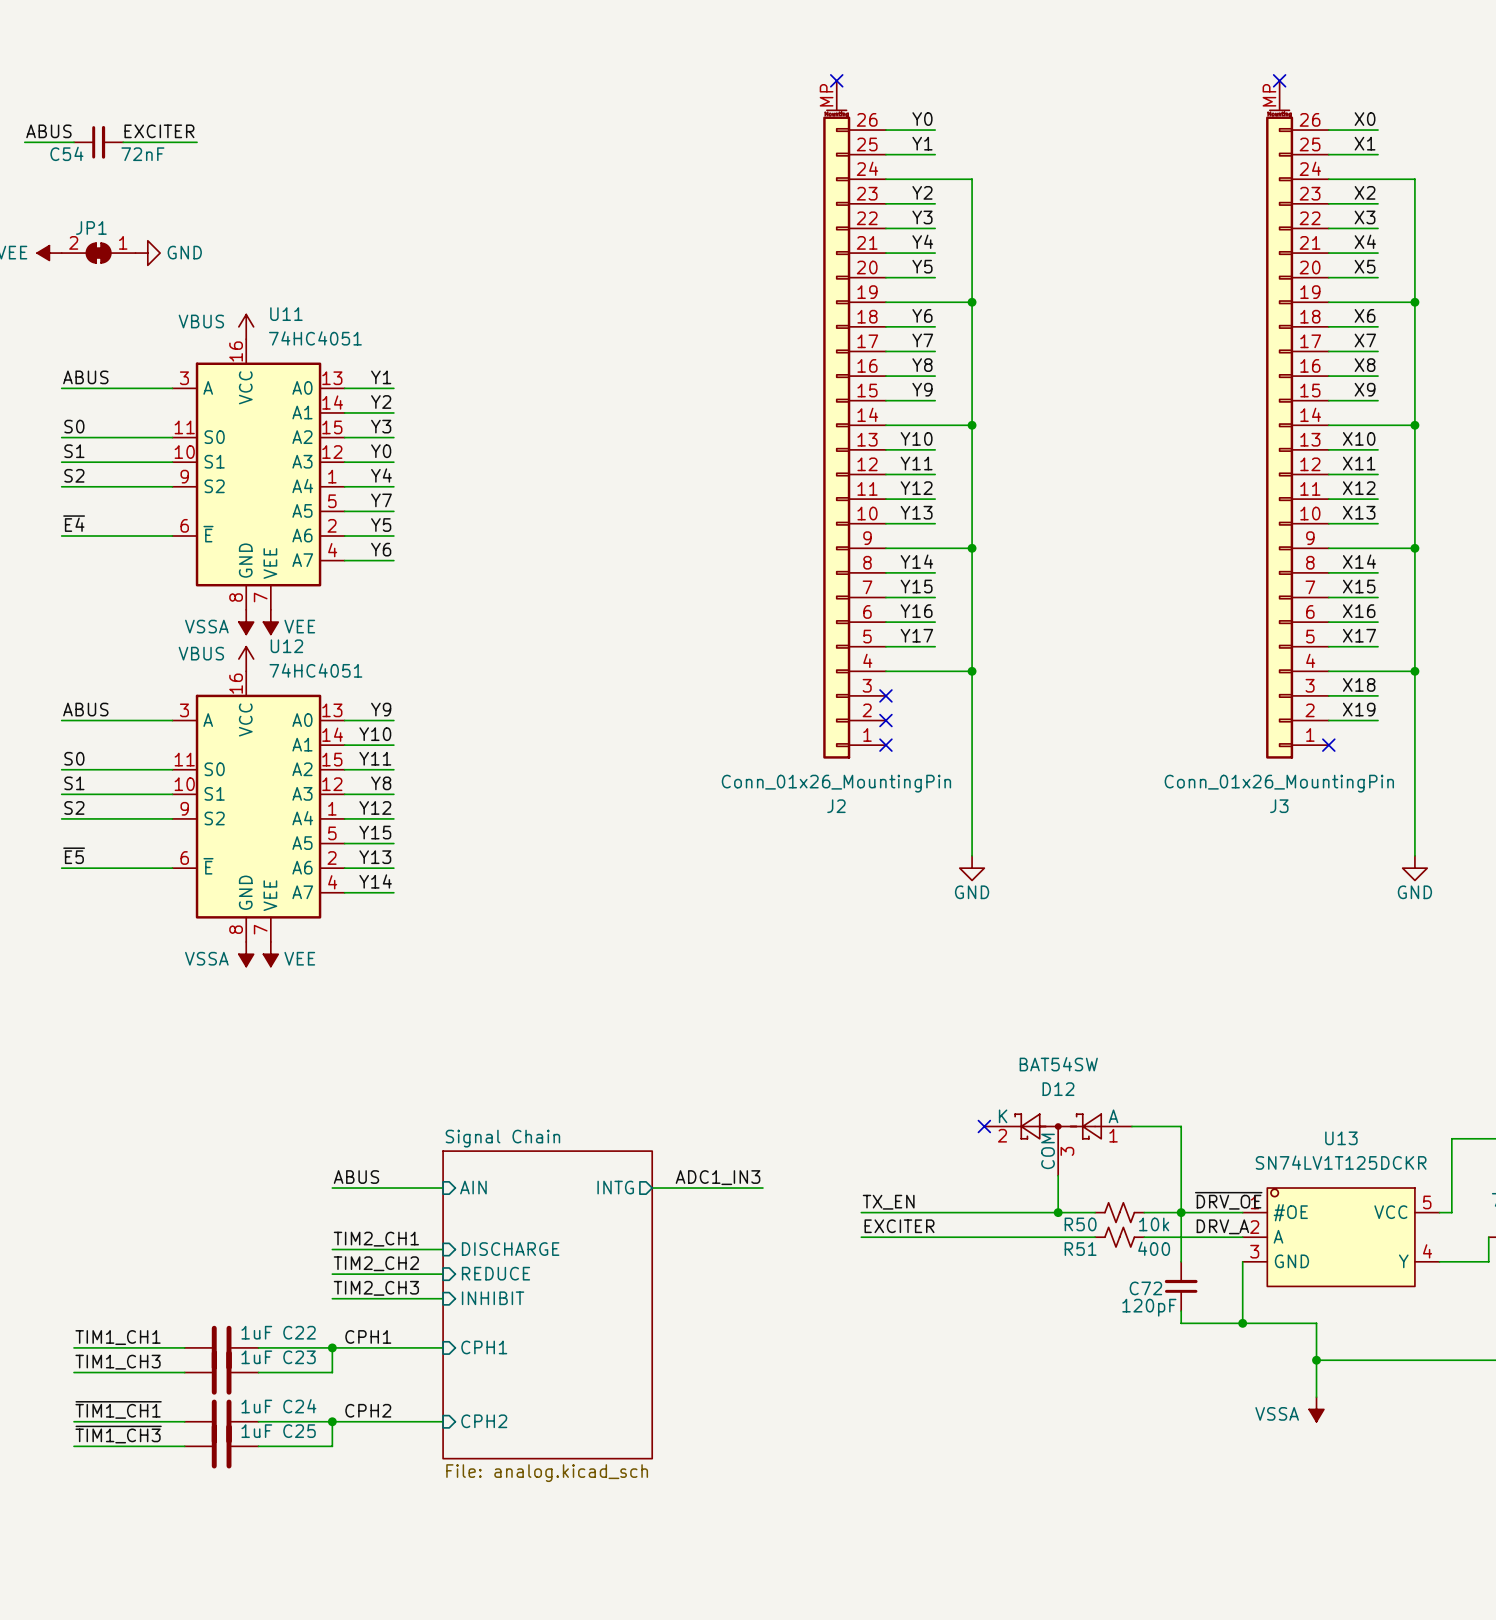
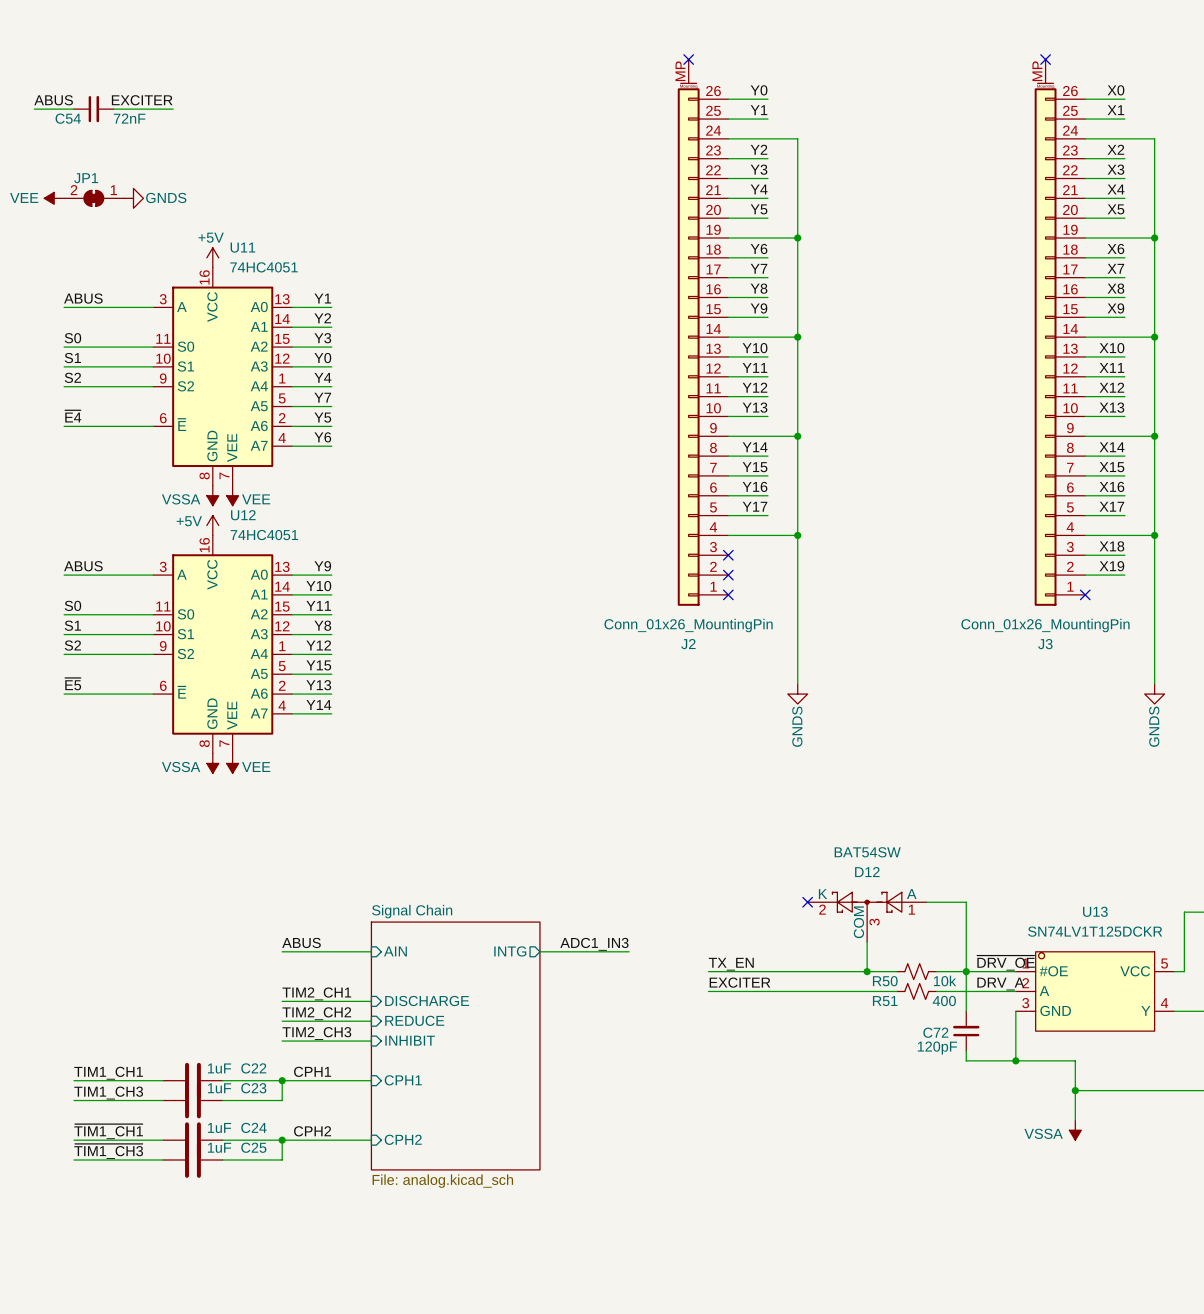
power symbol: GND (147, 253) -> GNDS (133, 198)
power symbol: VBUS (246, 326) -> +5V (212, 257)
power symbol: VBUS (246, 659) -> +5V (212, 525)
power symbol: GND (972, 868) -> GNDS (797, 694)
power symbol: GND (1414, 868) -> GNDS (1154, 694)

